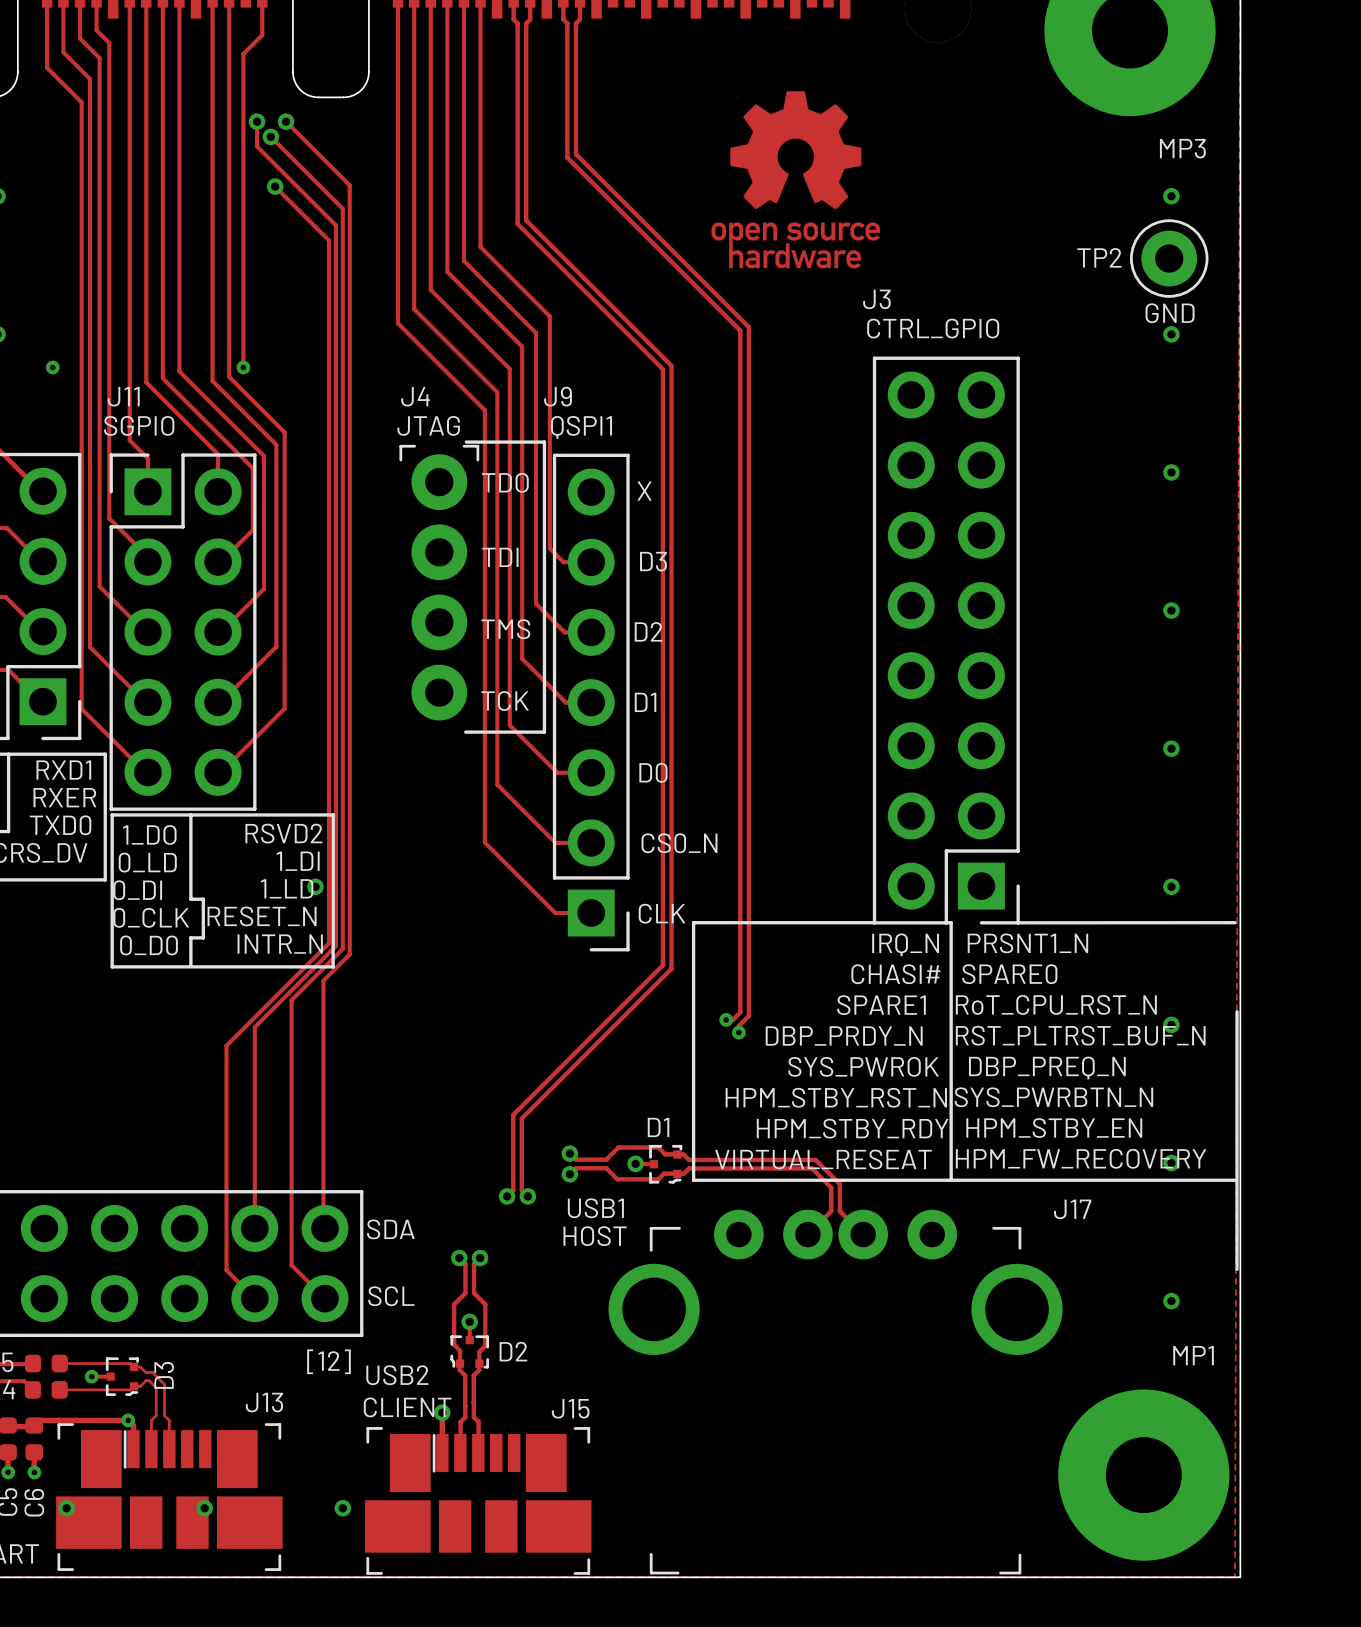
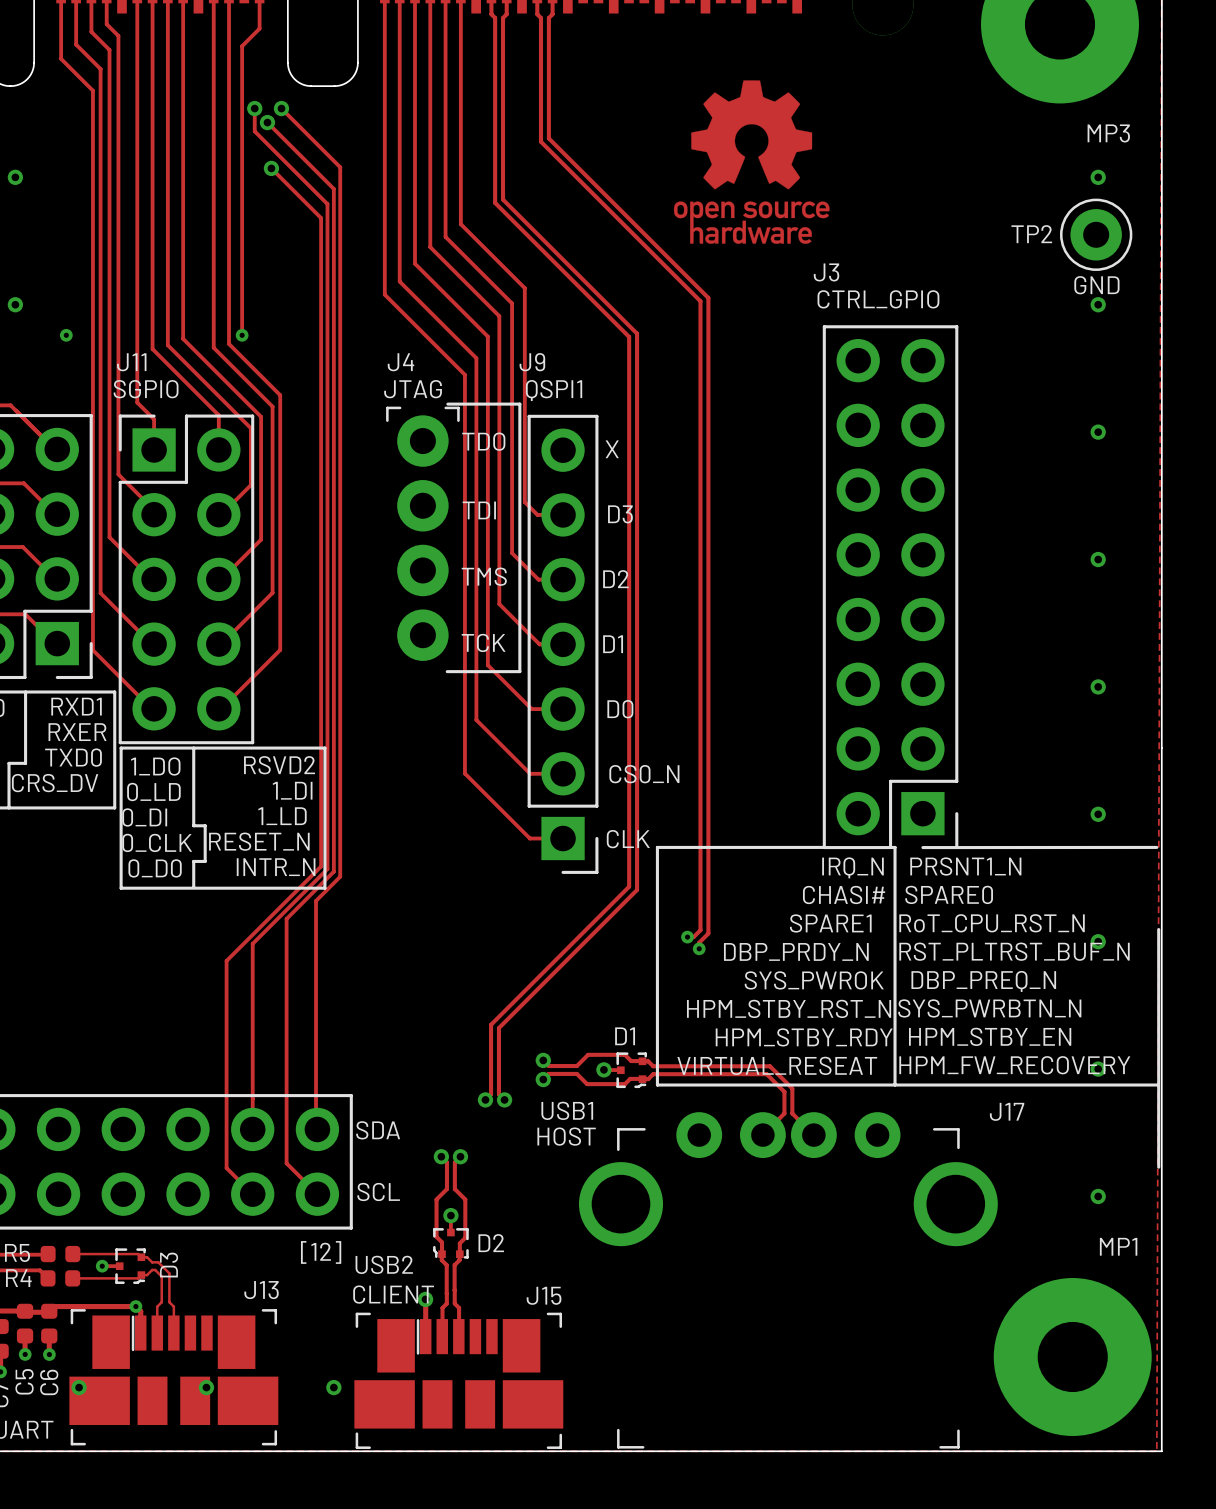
via: (315, 886) -> none

